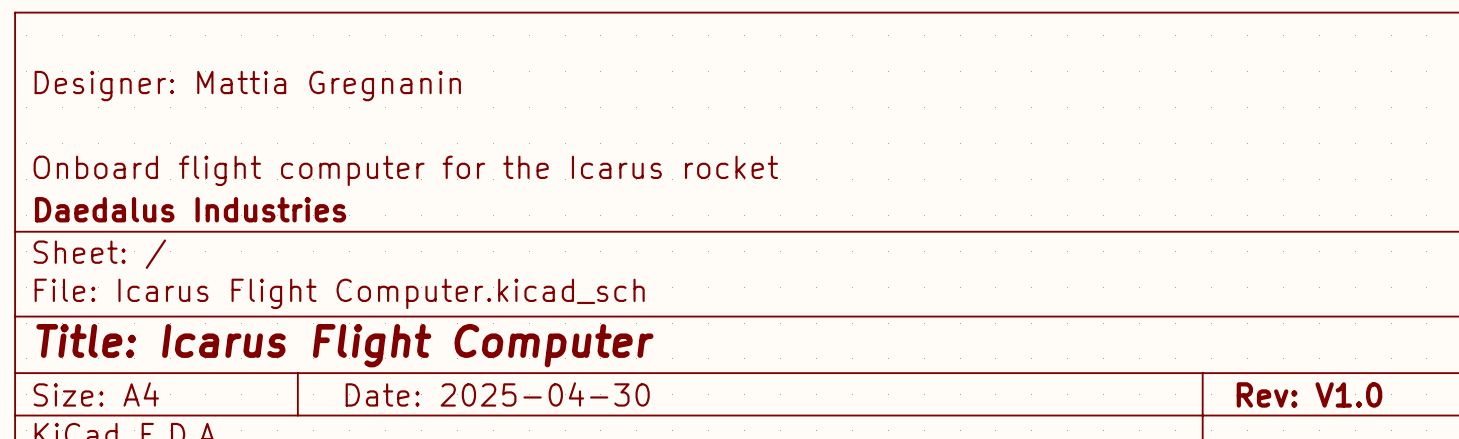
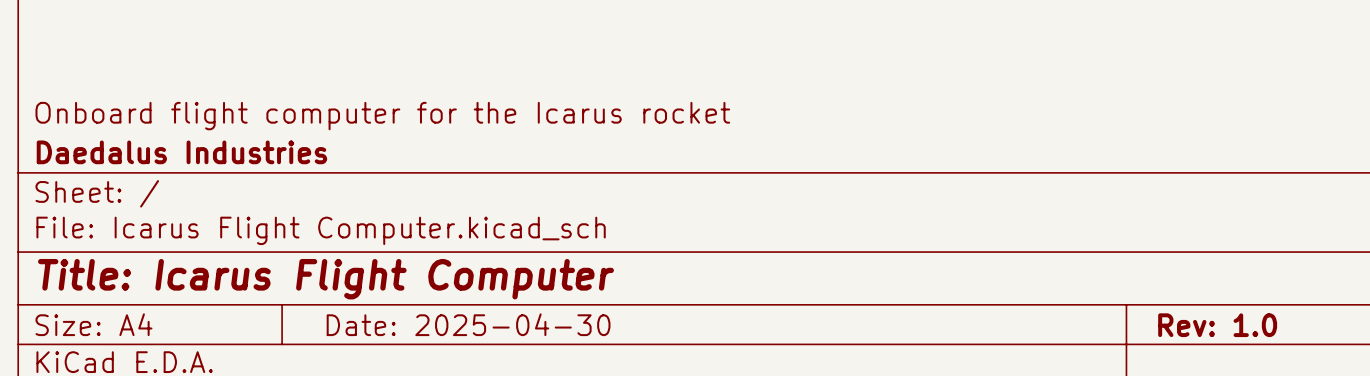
title block: Designer: Mattia Gregnanin (247, 86) -> none
title block: Rev: V1.0 (1309, 394) -> Rev: 1.0 (1217, 325)

